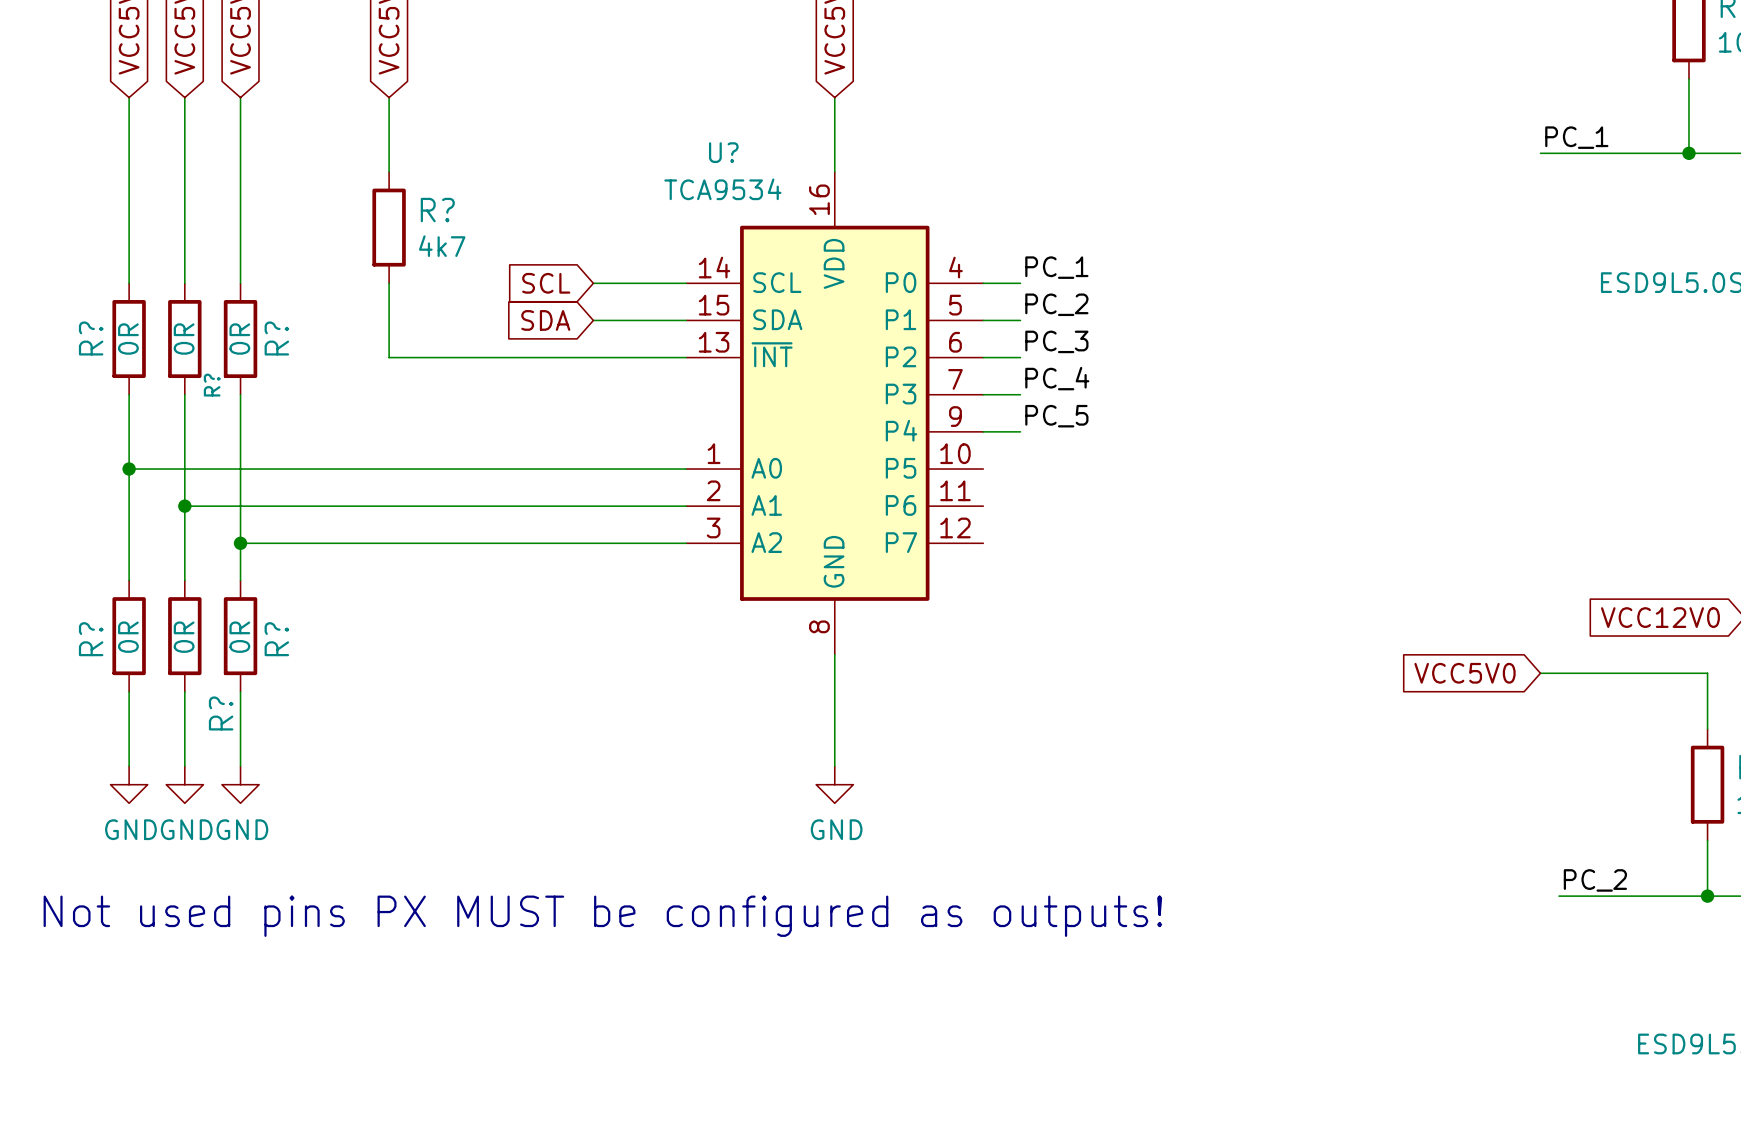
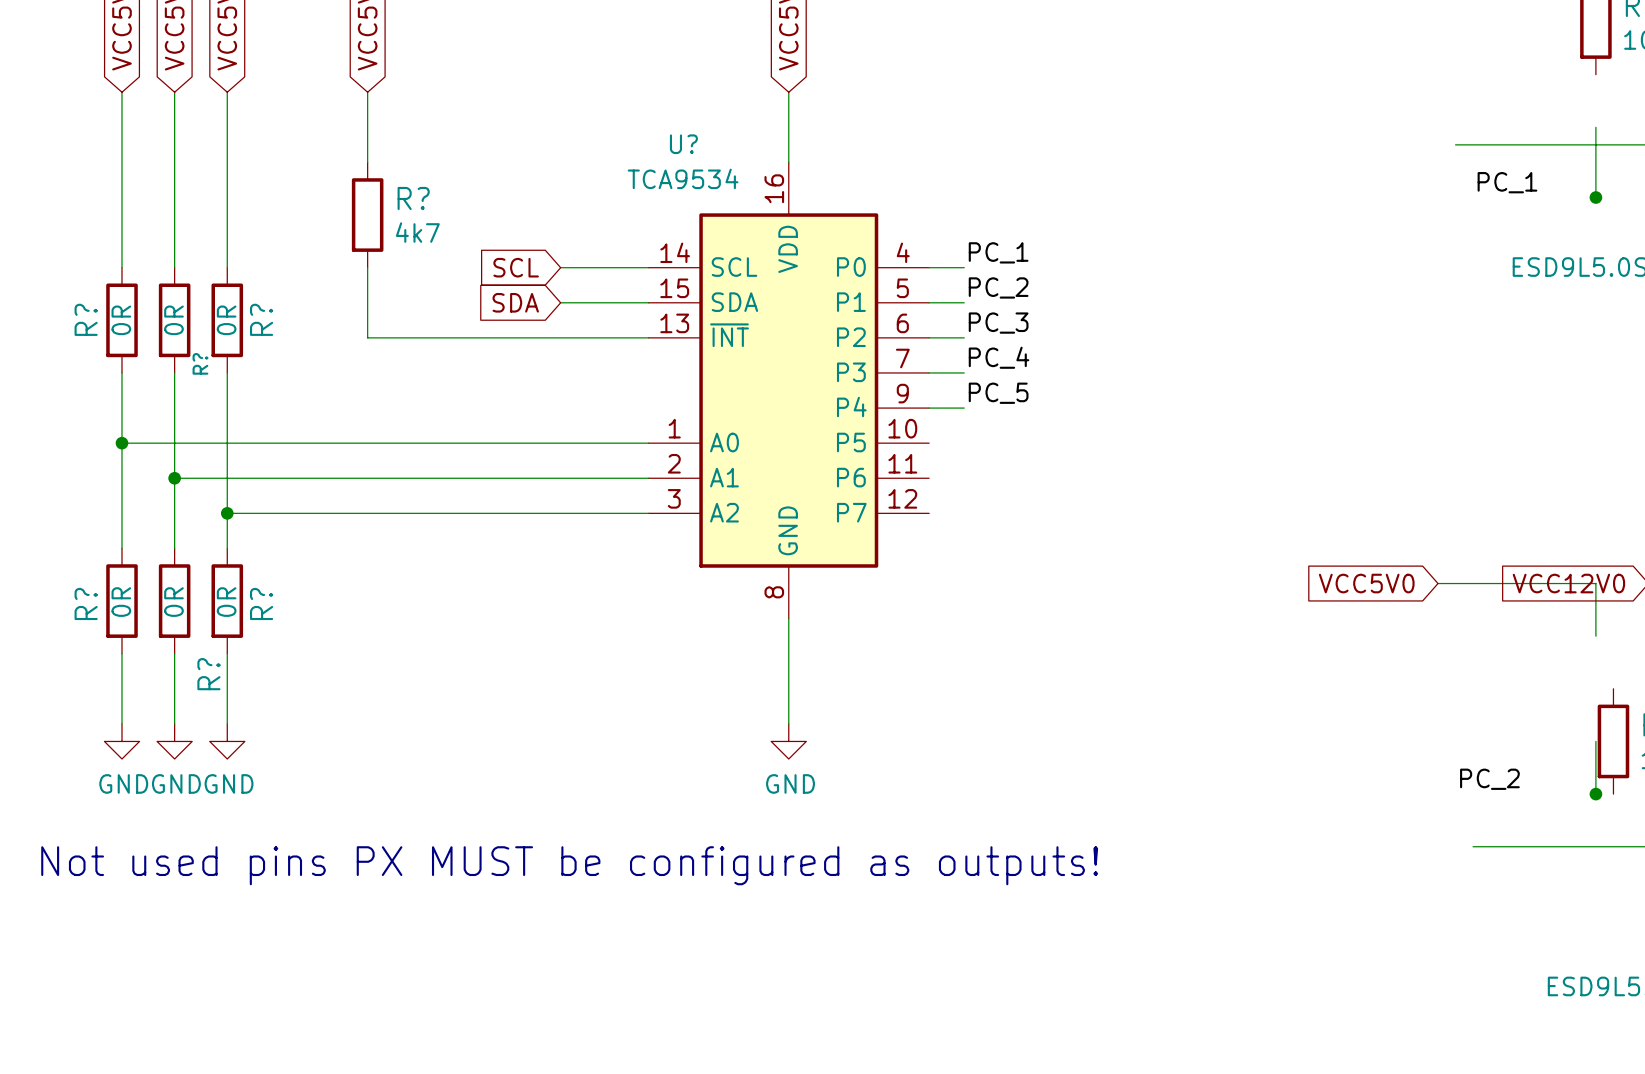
wire: (1688, 79) (1688, 134) -> (1595, 144) (1595, 197)
label position: PC_1 (1576, 137) -> PC_1 (1507, 182)
junction position: (1688, 153) -> (1595, 197)
global label position: VCC5V0 (1465, 673) -> VCC5V0 (1366, 583)
wire: (1540, 673) (1707, 673) (1707, 728) -> (1437, 583) (1595, 583) (1595, 636)
wire: (1707, 840) (1707, 896) -> (1595, 741) (1595, 794)
label position: PC_2 (1595, 880) -> PC_2 (1489, 779)
junction position: (1707, 896) -> (1595, 794)

